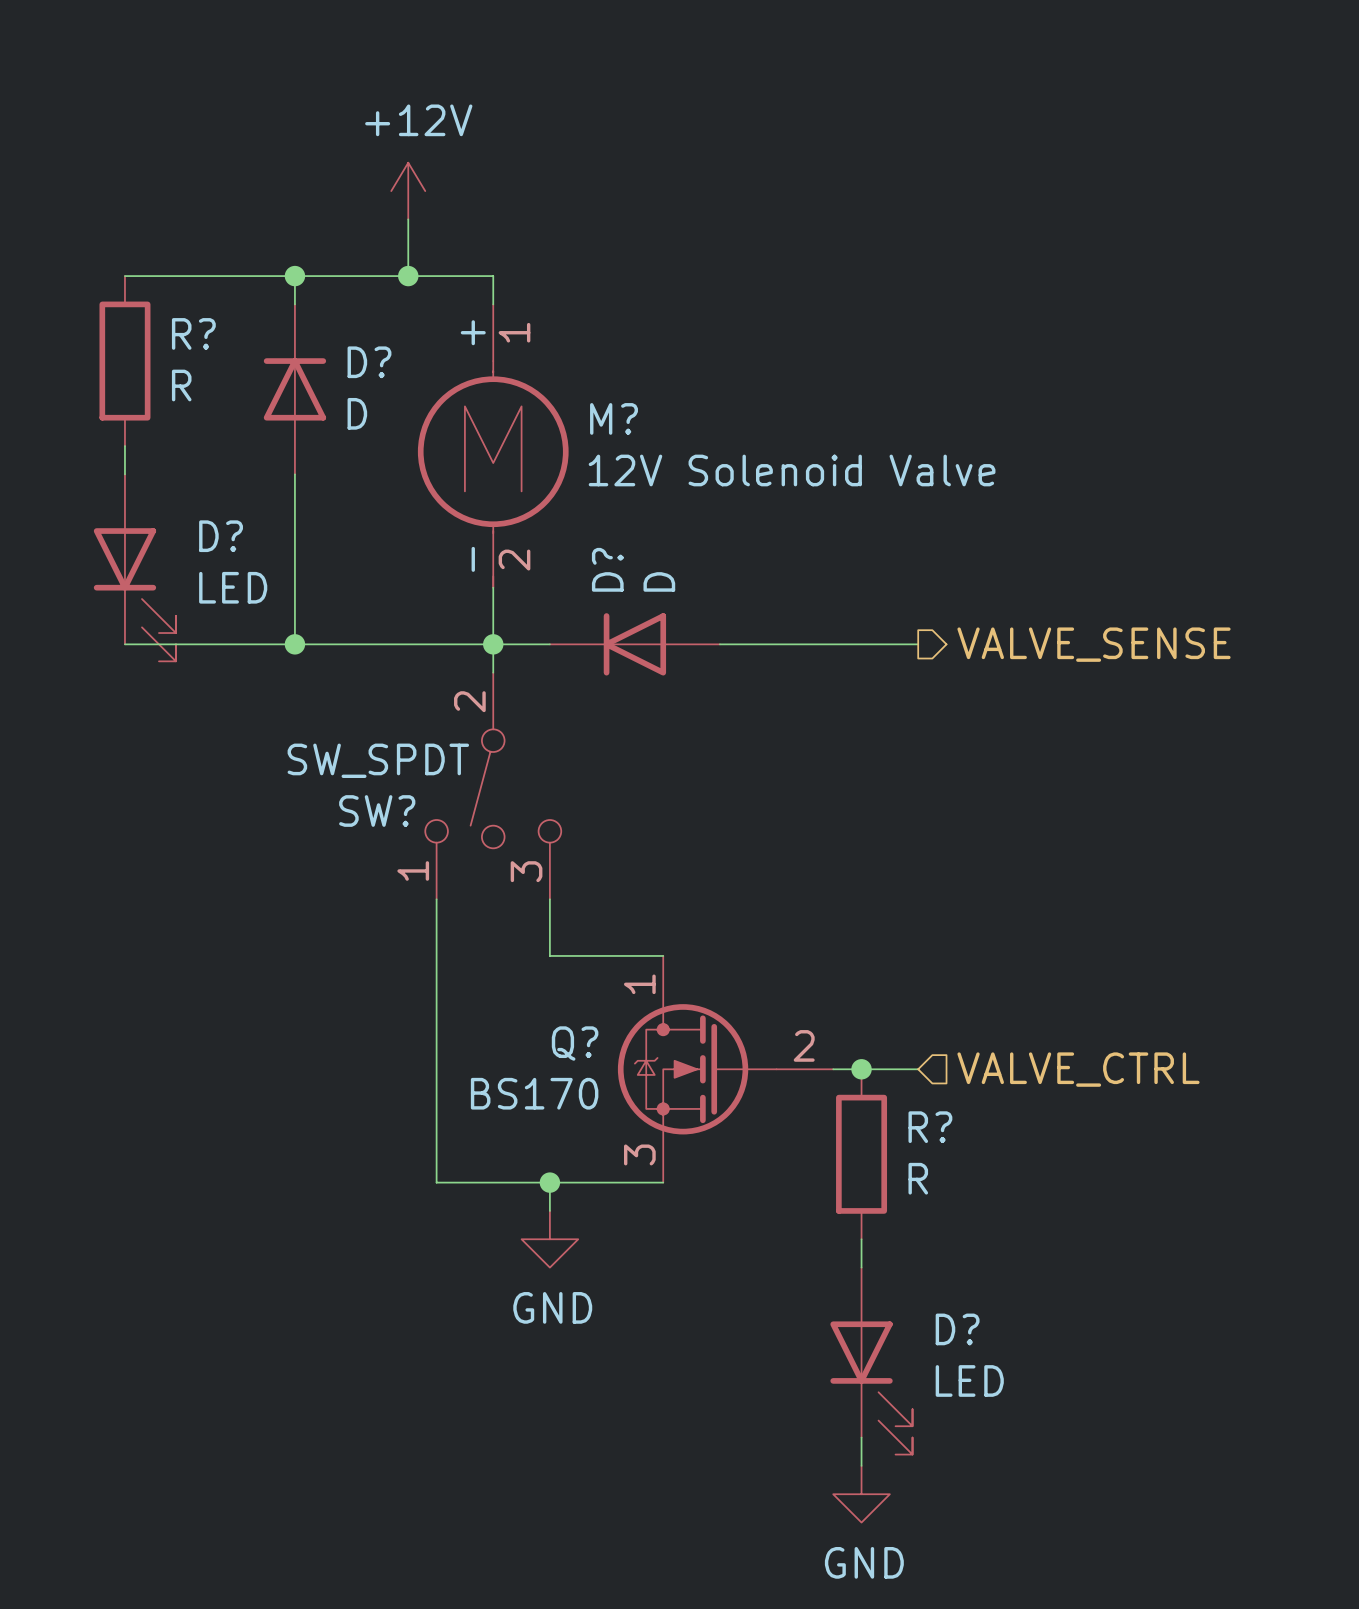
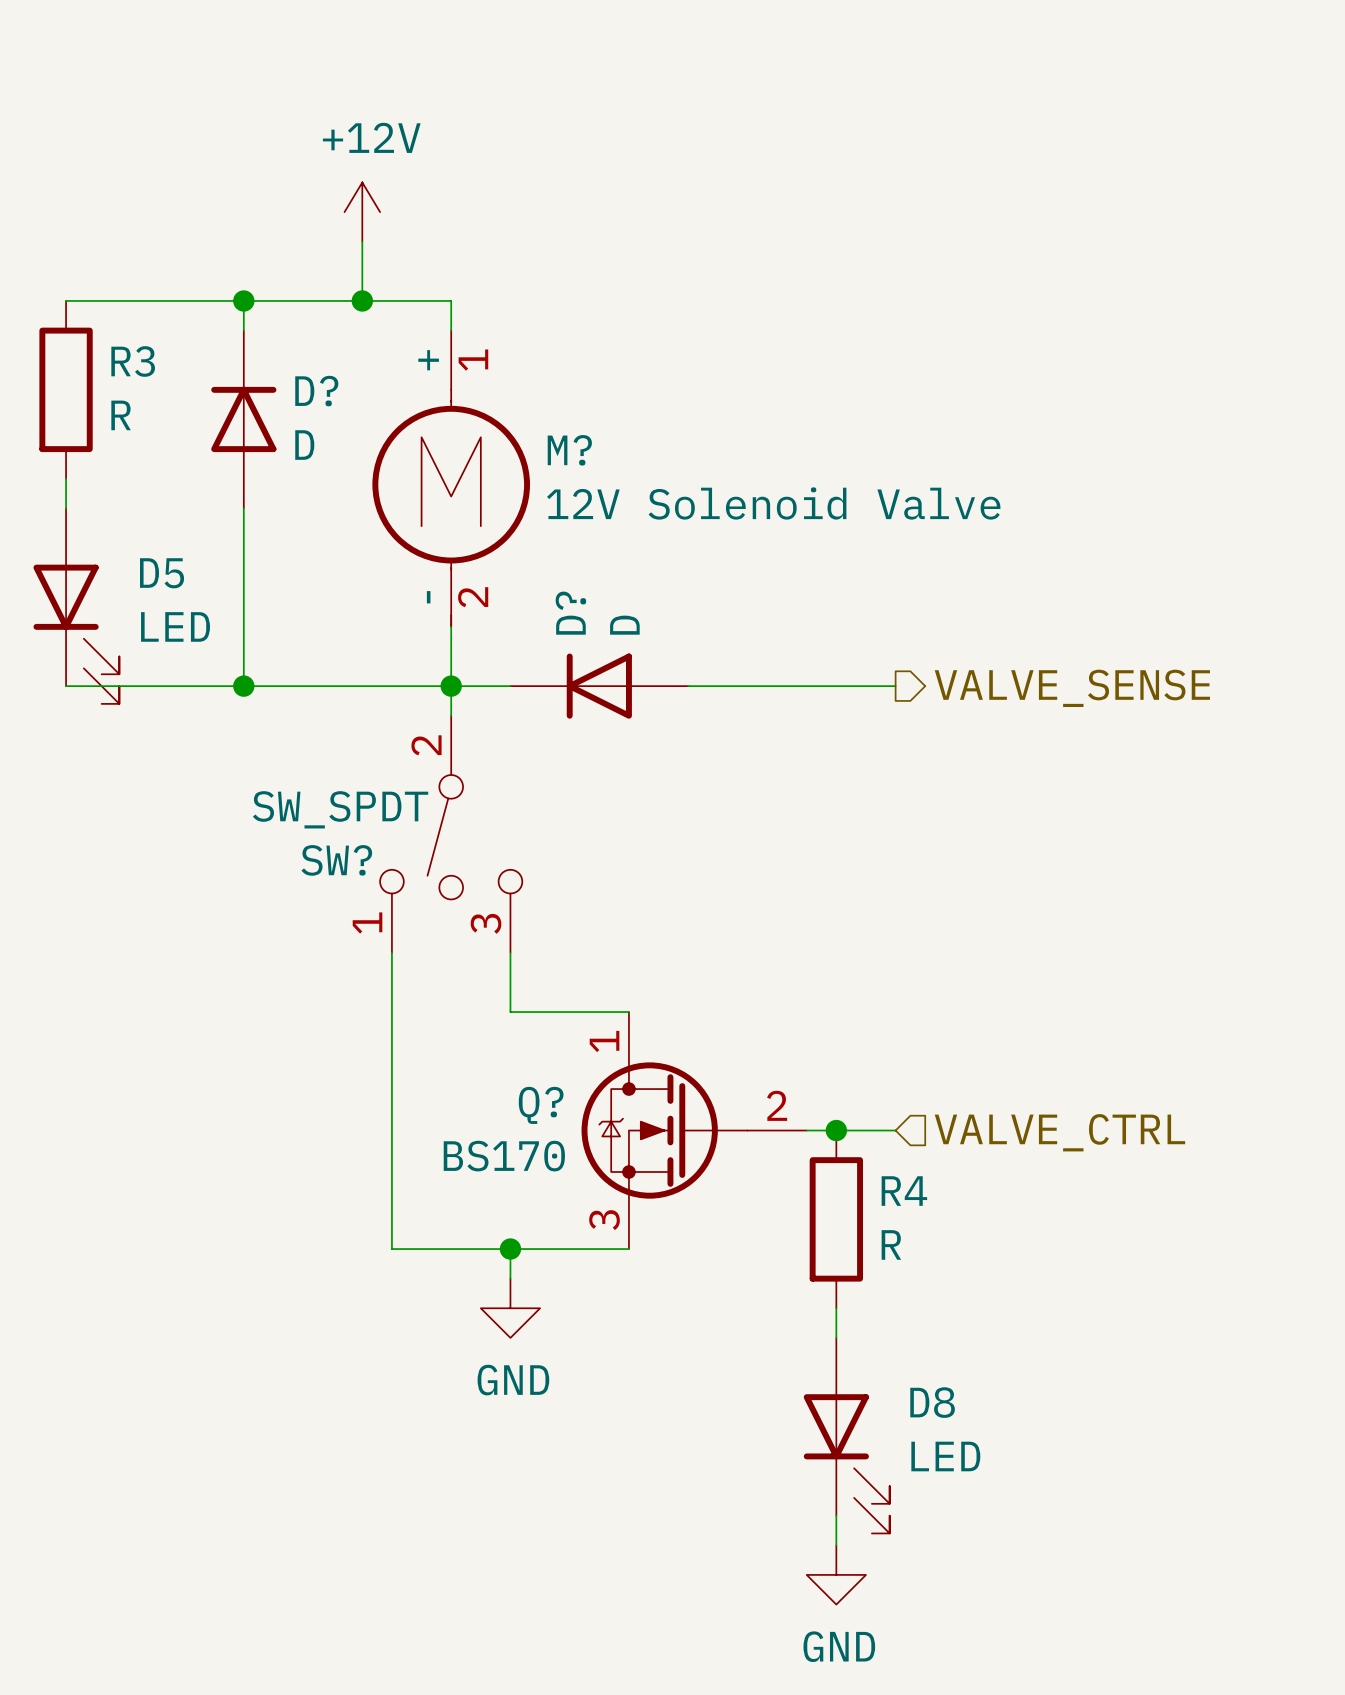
R? name: R? (193, 333) -> R3 (133, 361)
D? name: D? (221, 536) -> D5 (162, 573)
R? name: R? (930, 1127) -> R4 (904, 1191)
D? name: D? (957, 1329) -> D8 (932, 1402)

